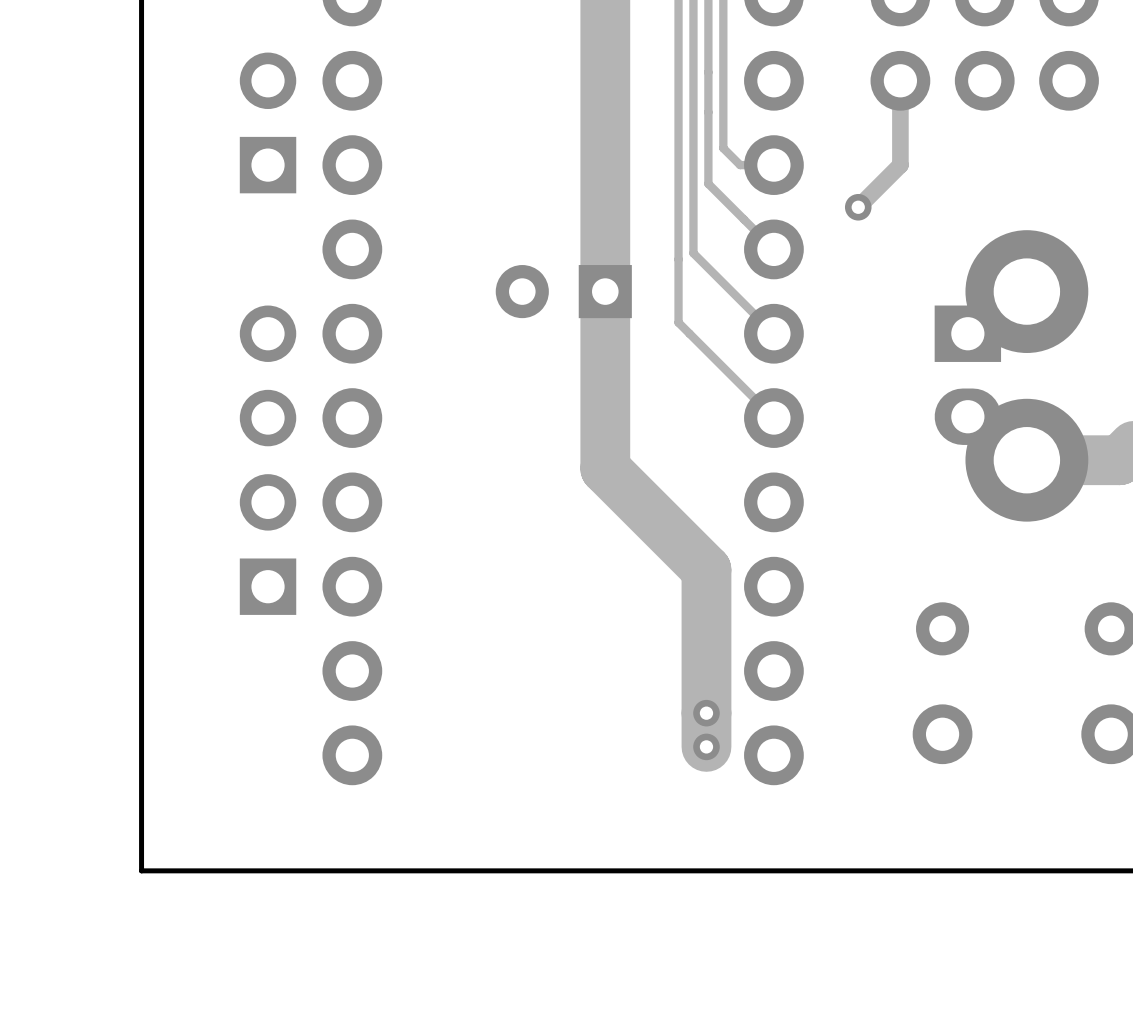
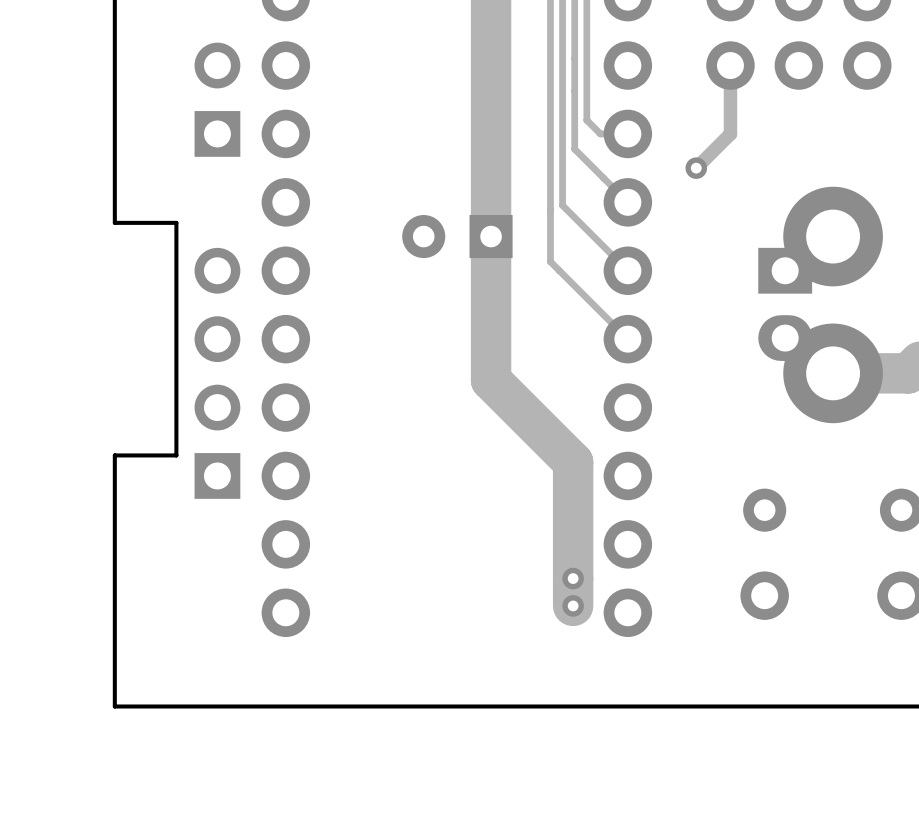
board edge: (141, 274) (141, 561) -> (114, 222) (176, 222) (176, 455) (114, 455)

